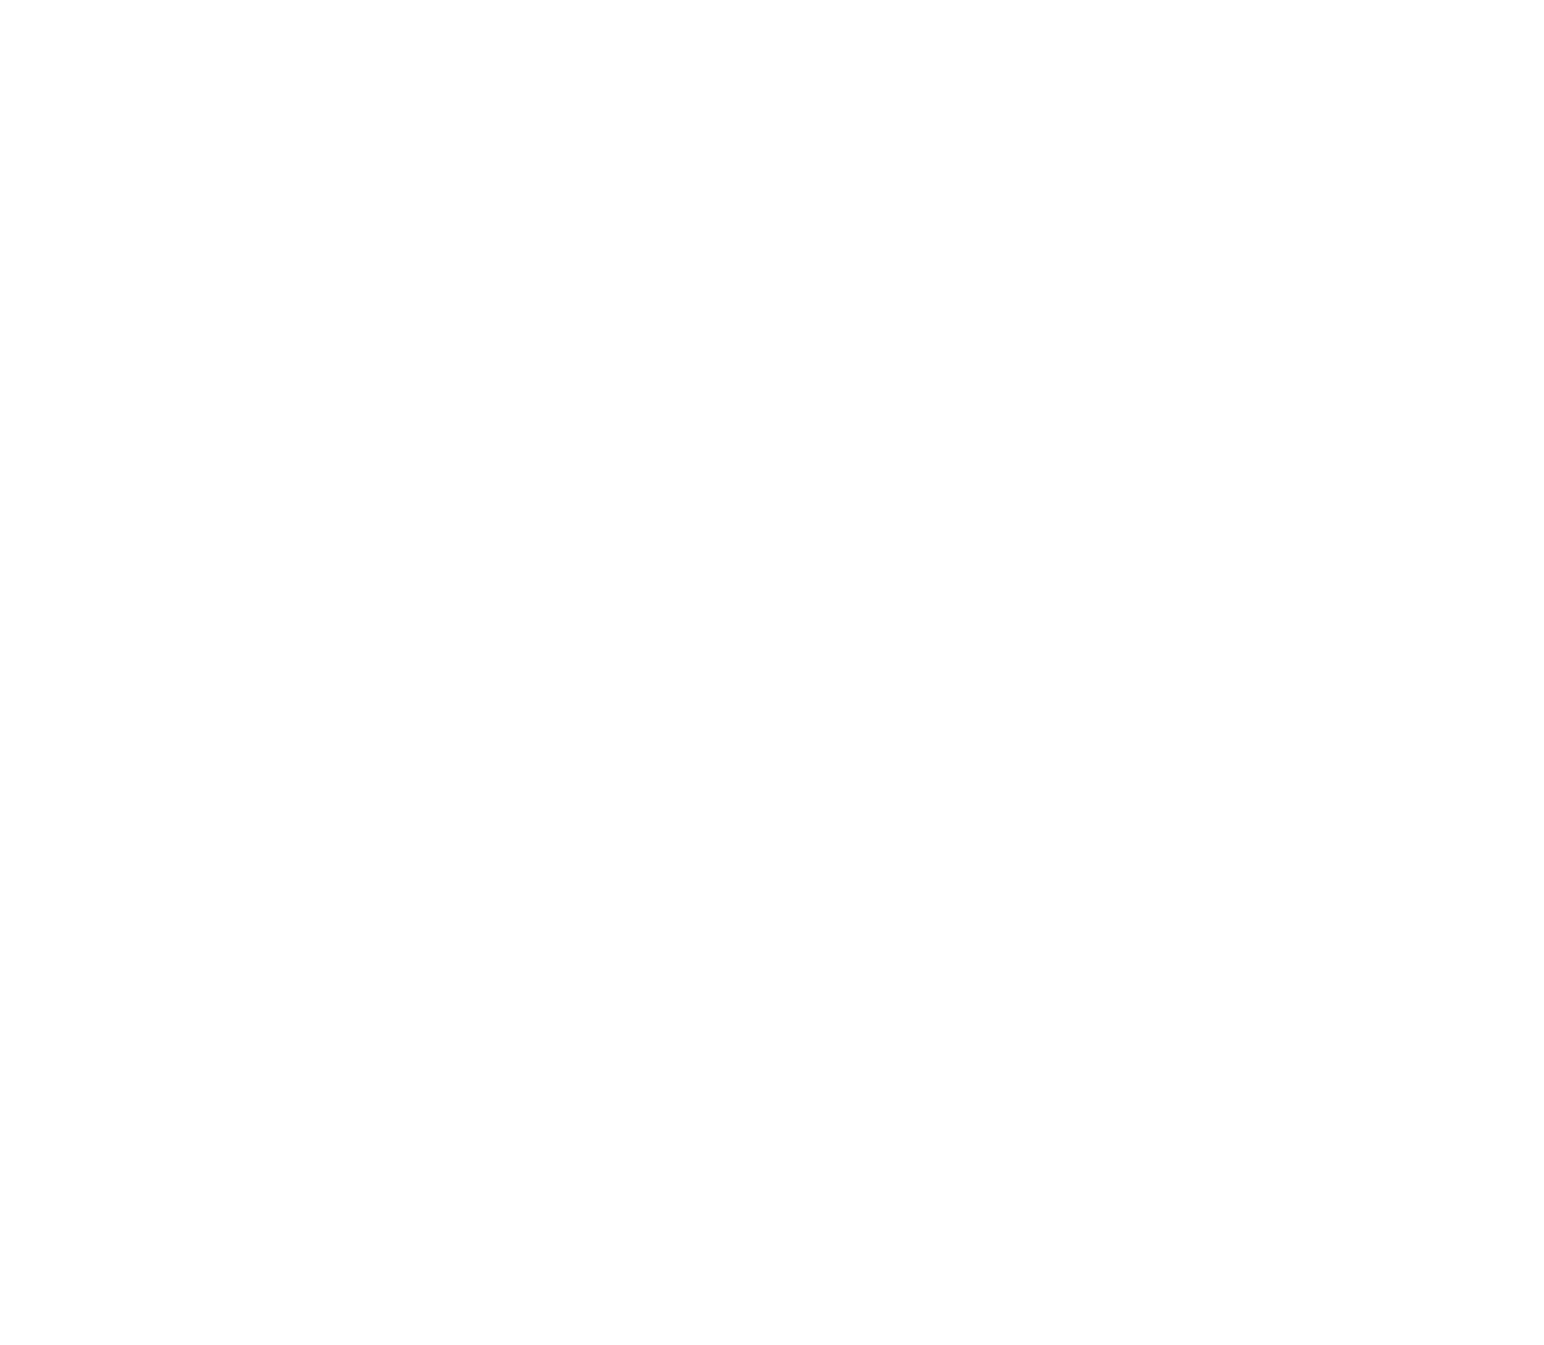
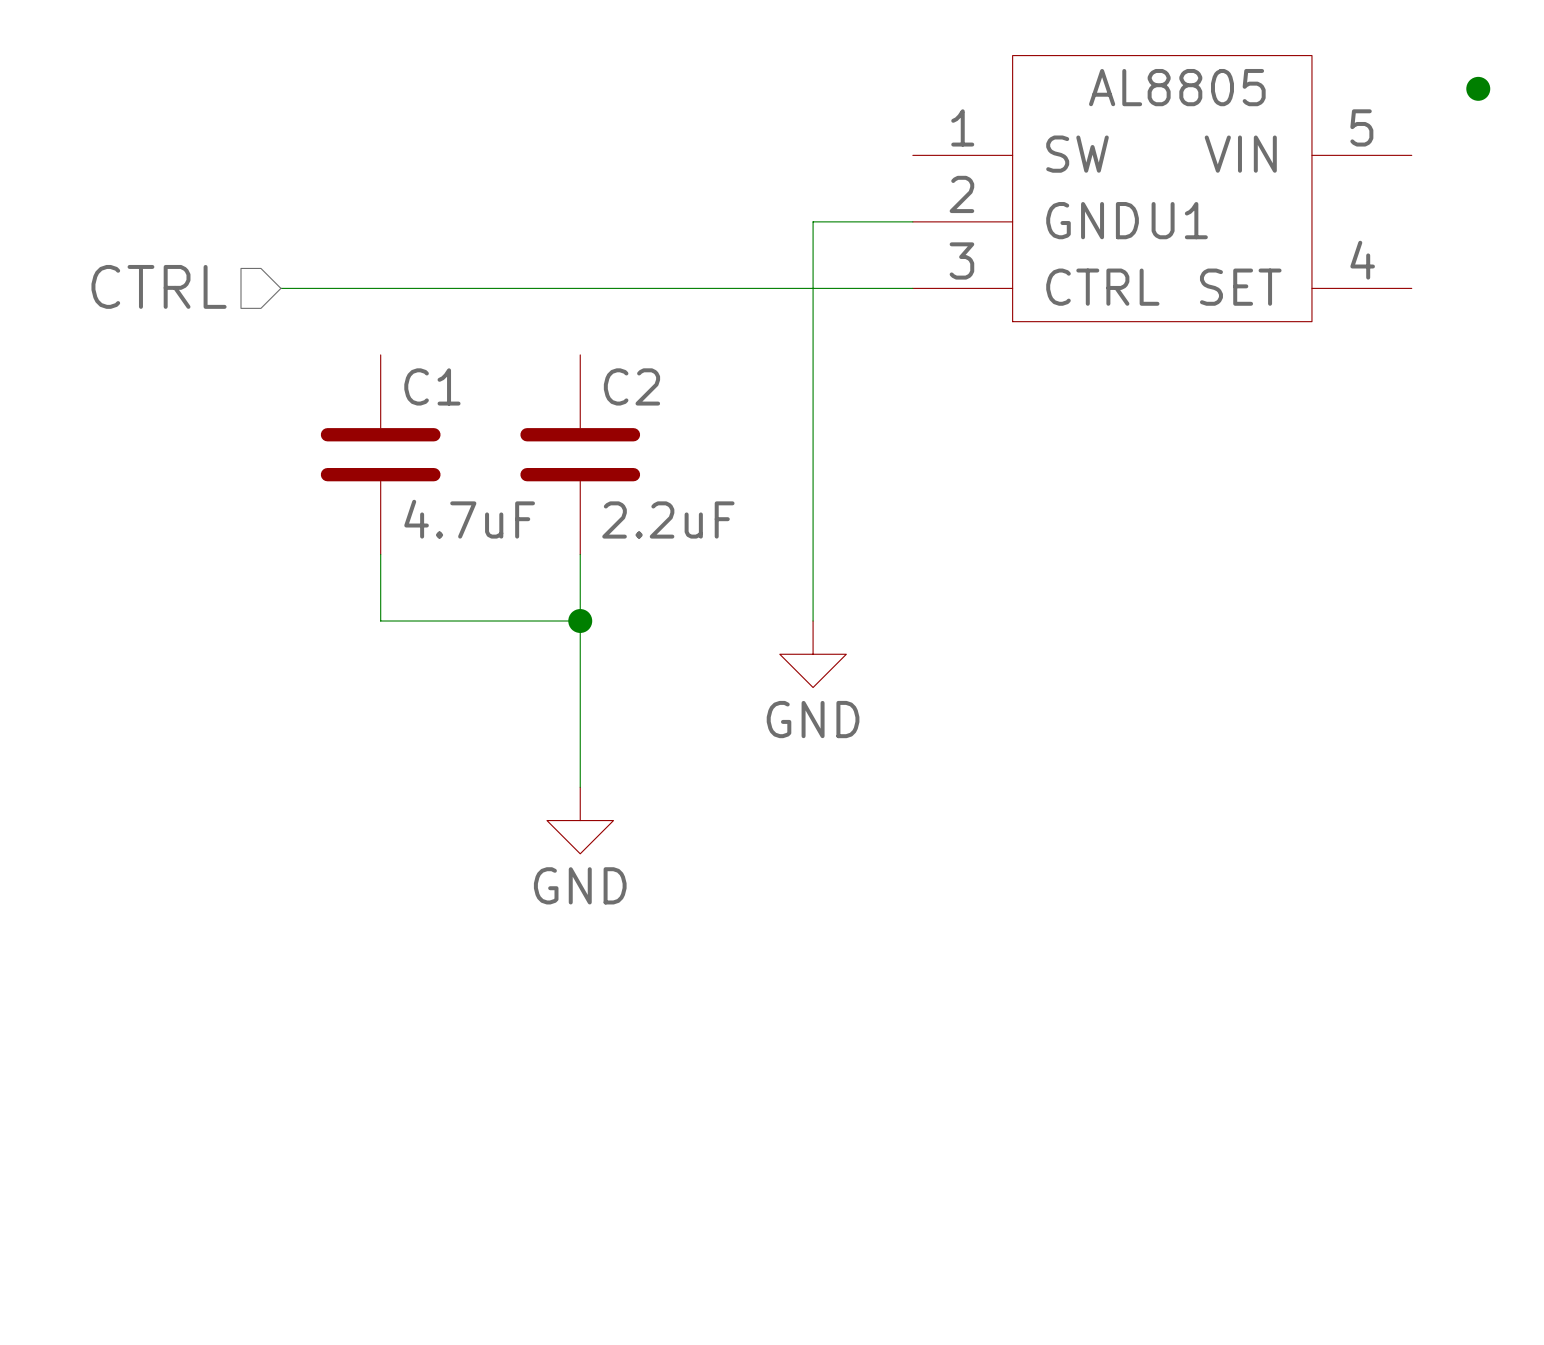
junction: none -> (1478, 88)
U1: none -> AL8805 (1162, 188)
wire: none -> (912, 221) (813, 221) (813, 621)
hierarchical label: none -> CTRL (159, 286)
wire: none -> (280, 288) (912, 288)
C1: none -> 4.7uF (380, 454)
C2: none -> 2.2uF (580, 454)
wire: none -> (380, 554) (380, 621) (580, 621)
wire: none -> (580, 554) (580, 787)
junction: none -> (580, 621)
power symbol: none -> GND (813, 654)
power symbol: none -> GND (580, 820)

